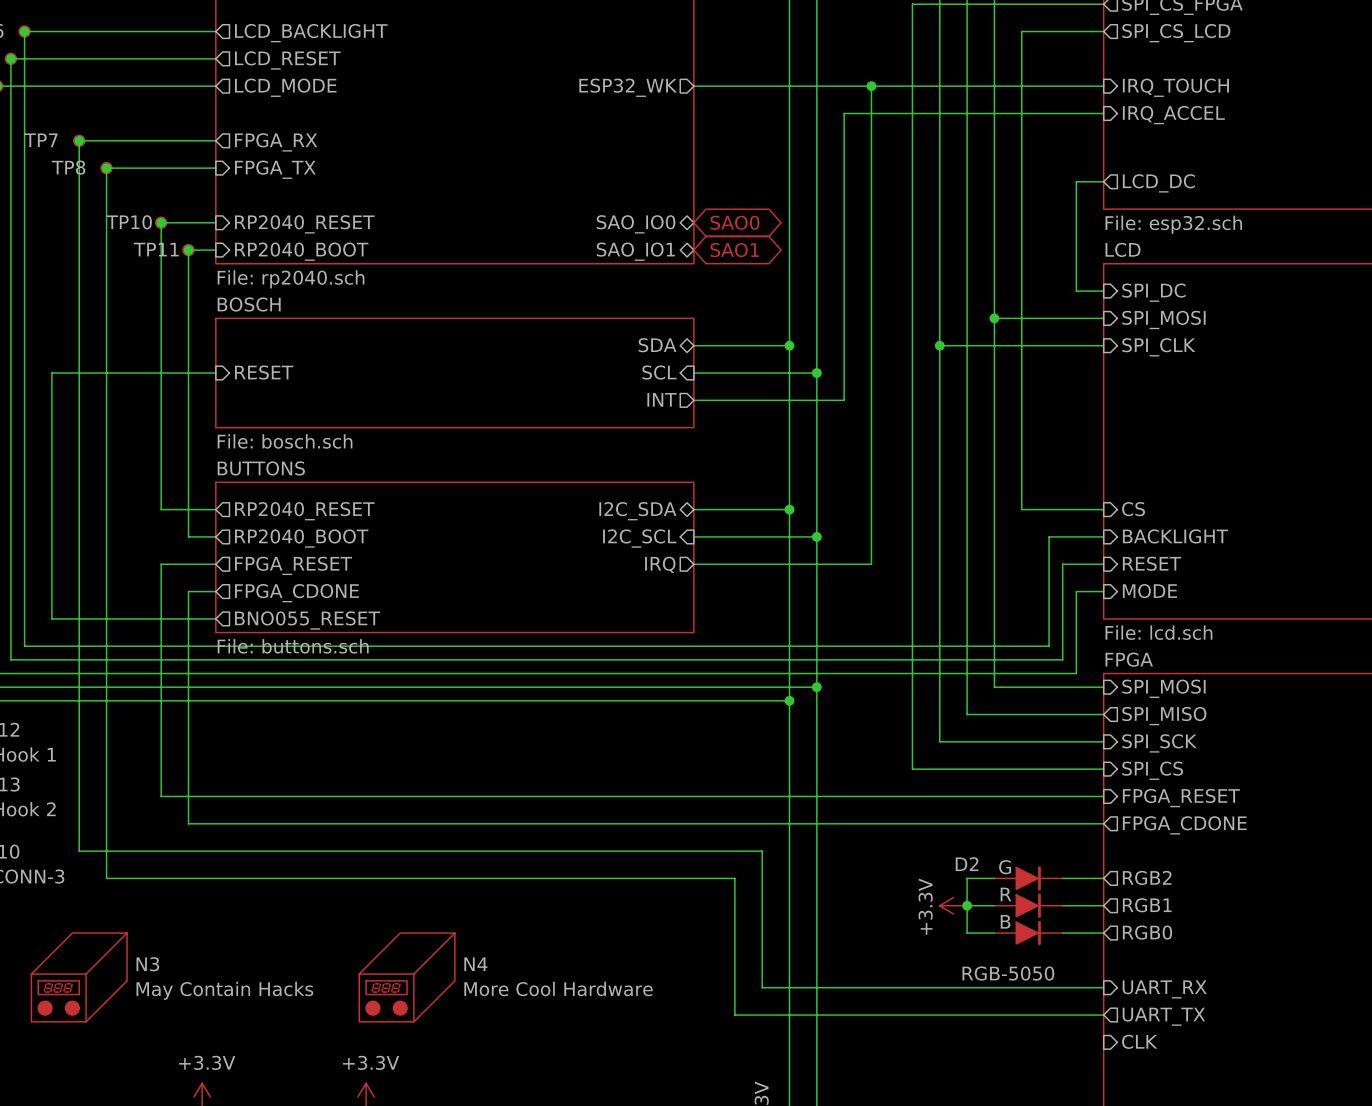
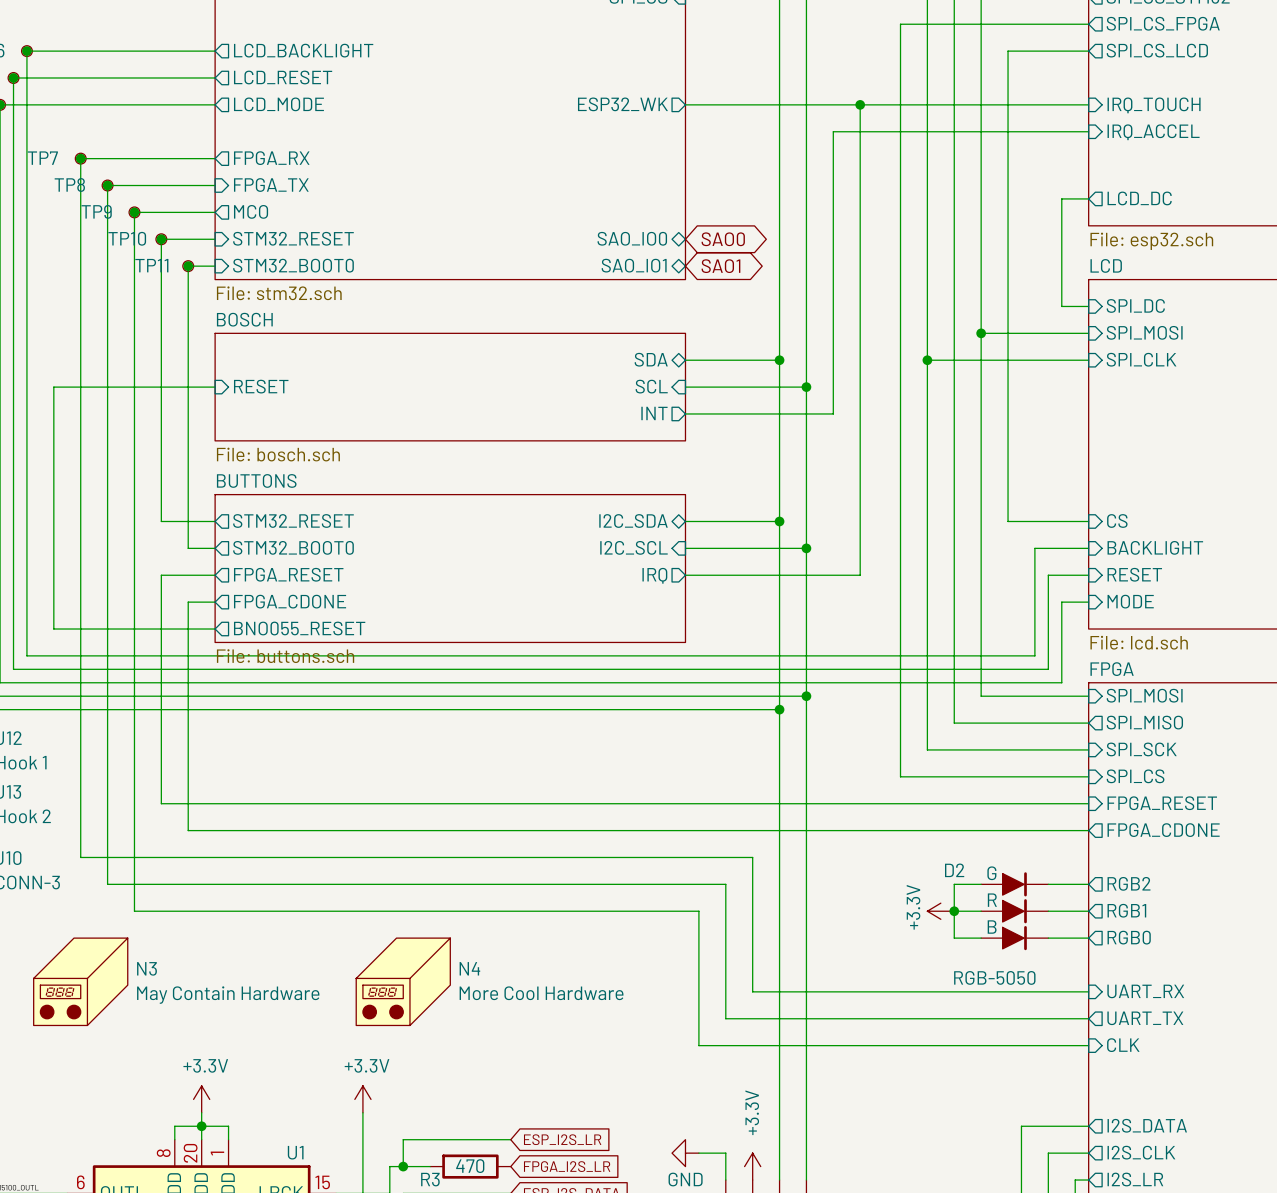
sheet pin: none -> MCO (251, 211)
TP9: none -> (134, 212)
junction: none -> (134, 212)
wire: none -> (215, 212) (134, 212) (134, 911) (698, 911) (698, 1045) (1088, 1045)
sheet pin: RP2040_RESET (304, 224) -> STM32_RESET (293, 238)
sheet pin: RP2040_BOOT (301, 251) -> STM32_BOOT0 (293, 265)
sheet value: File: rp2040.sch (291, 279) -> File: stm32.sch (279, 293)
sheet pin: RP2040_RESET (304, 511) -> STM32_RESET (293, 520)
sheet pin: RP2040_BOOT (301, 538) -> STM32_BOOT0 (293, 547)
N3 value: May Contain Hacks (224, 990) -> May Contain Hardware (228, 995)

